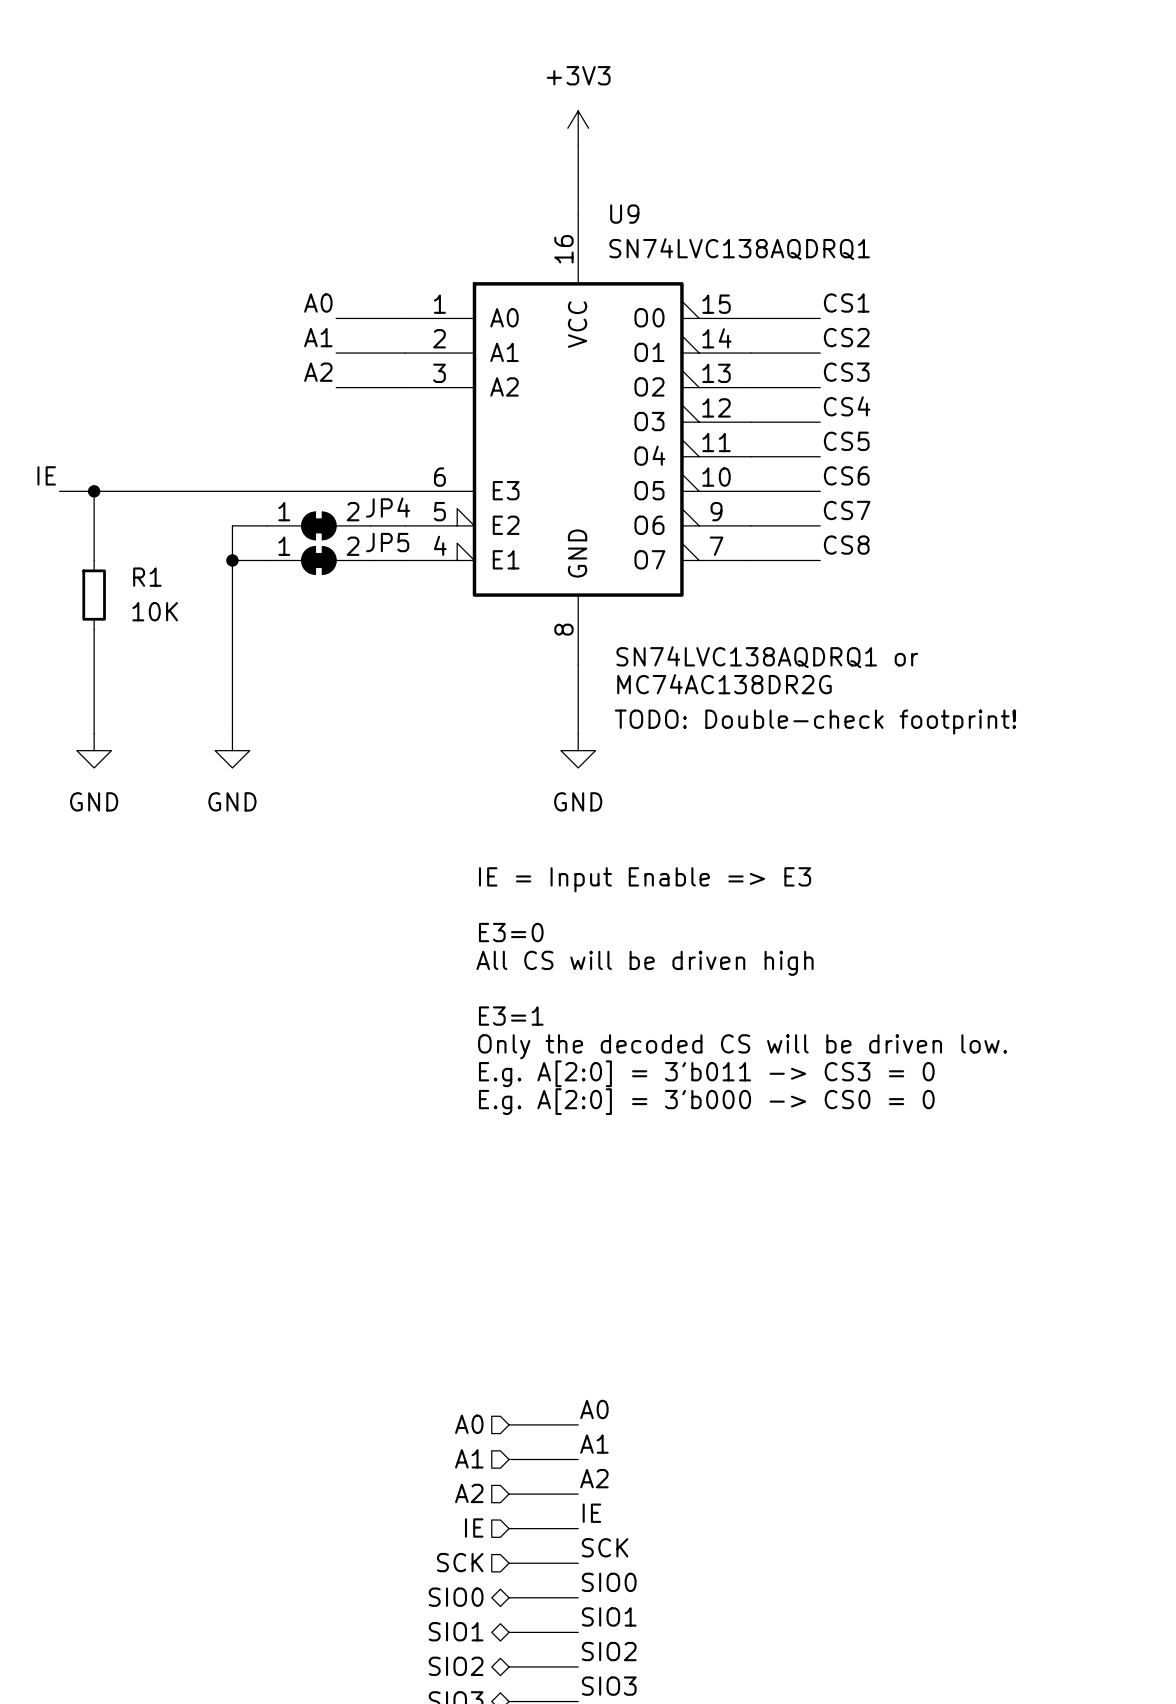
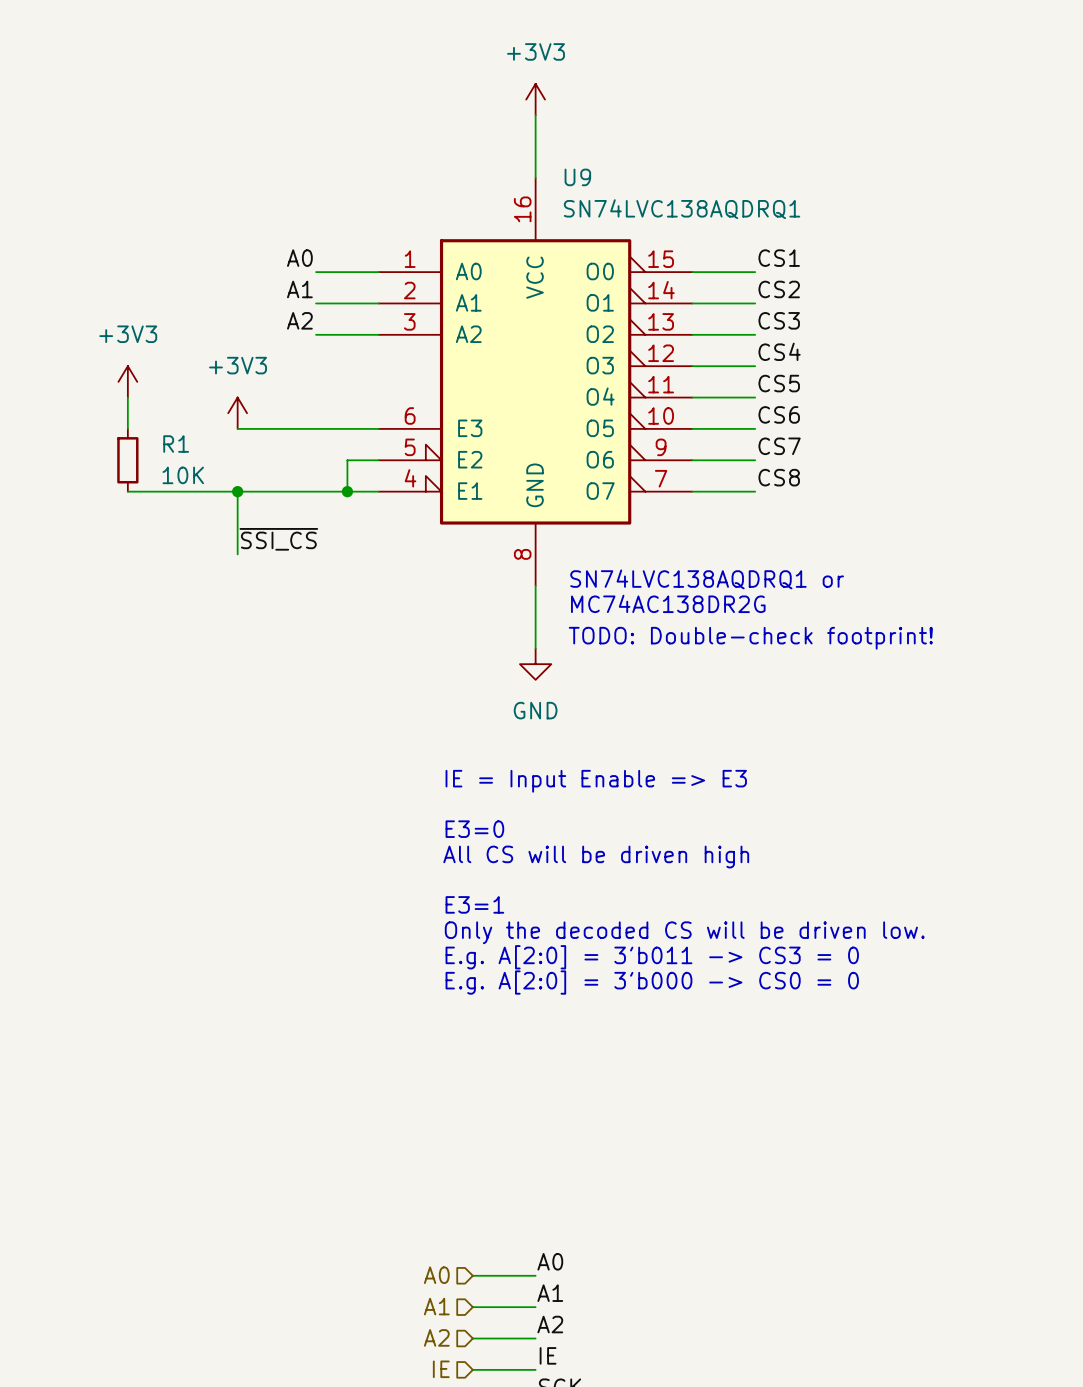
power symbol: none -> +3V3 (127, 381)
wire: none -> (127, 397) (127, 428)
power symbol: none -> +3V3 (237, 413)
label: IE (46, 475) -> none
wire: (59, 491) (249, 491) -> none
wire: (94, 491) (94, 560) -> (237, 491) (237, 554)
junction: (94, 491) -> none
wire: (267, 525) (232, 525) (232, 733) -> none
JP4: (318, 525) -> none
wire: none -> (127, 491) (221, 491)
junction position: (232, 560) -> (237, 491)
JP5: (318, 560) -> none
junction: none -> (347, 491)
R1 position: (94, 595) -> (127, 460)
label: none -> ~{SSI_CS} (278, 539)
wire: (94, 629) (94, 733) -> none
power symbol: GND (94, 750) -> none
power symbol: GND (232, 750) -> none

